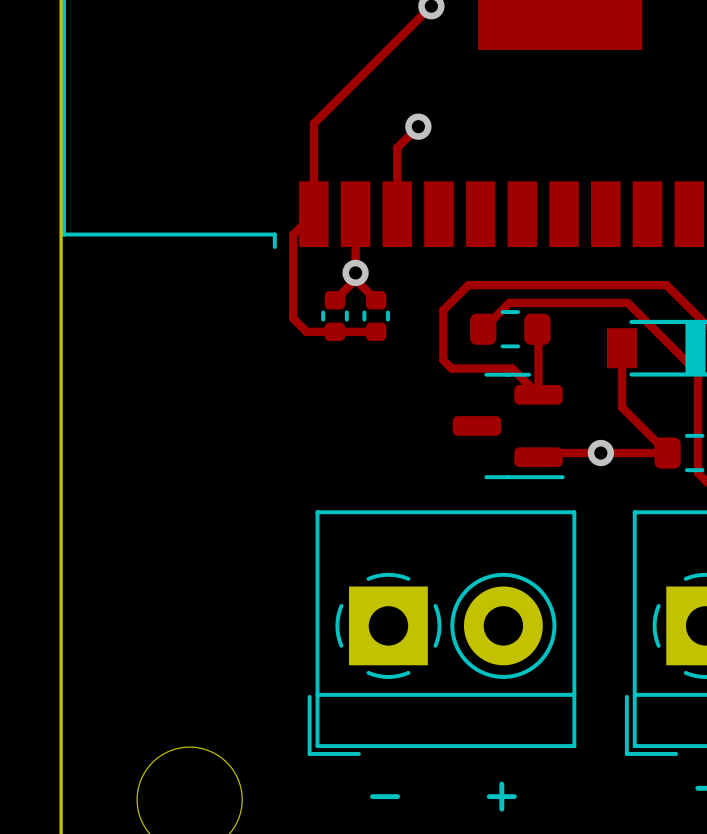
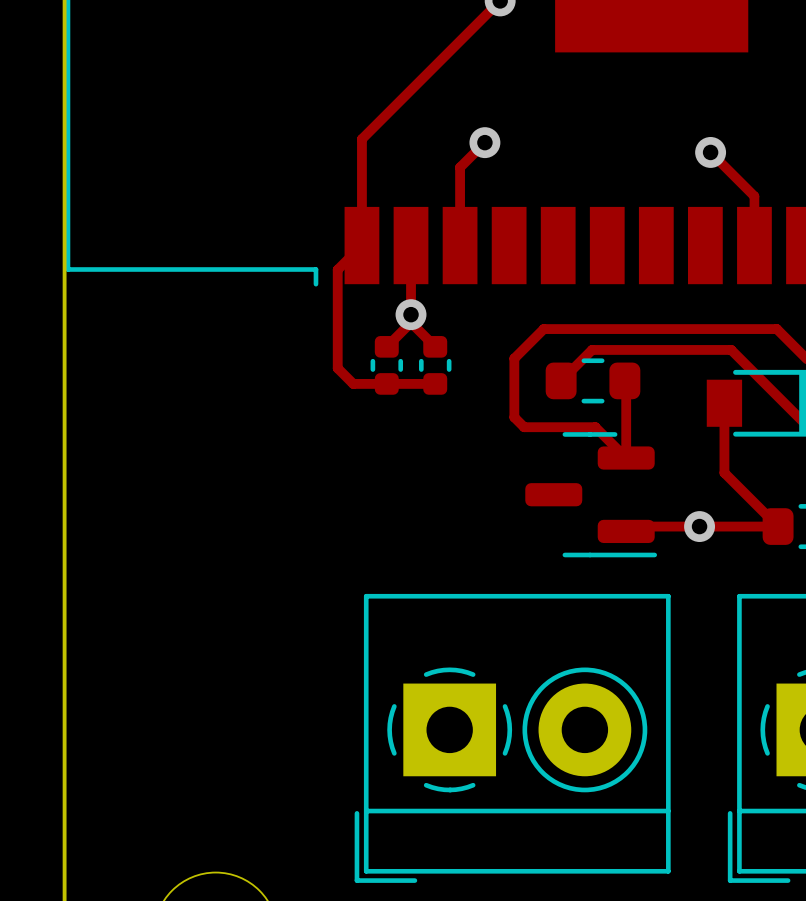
track: none -> (710, 152) (754, 196) (754, 245)
via: none -> (710, 152)

